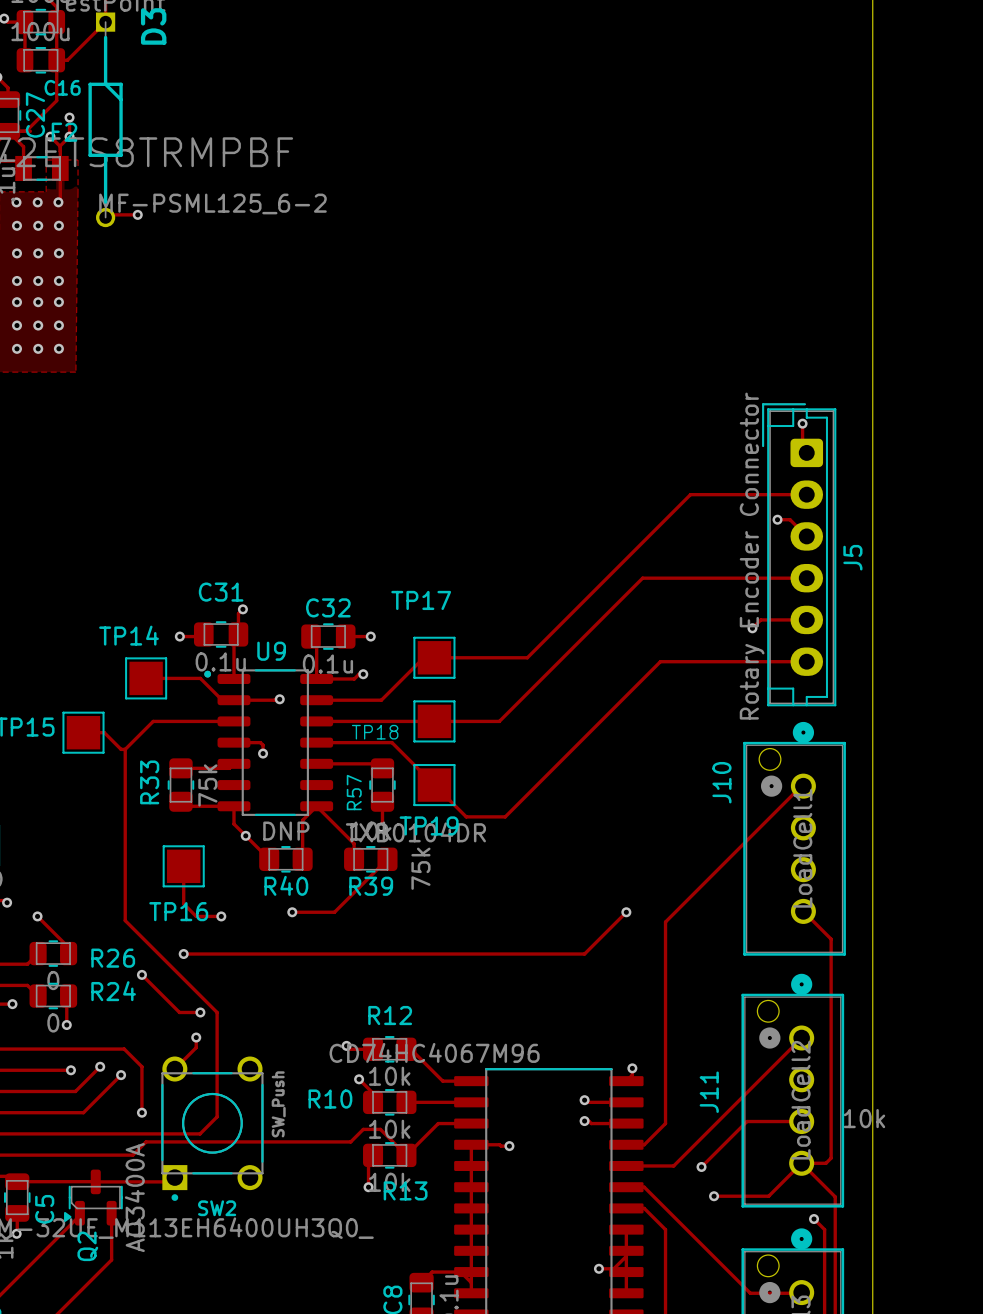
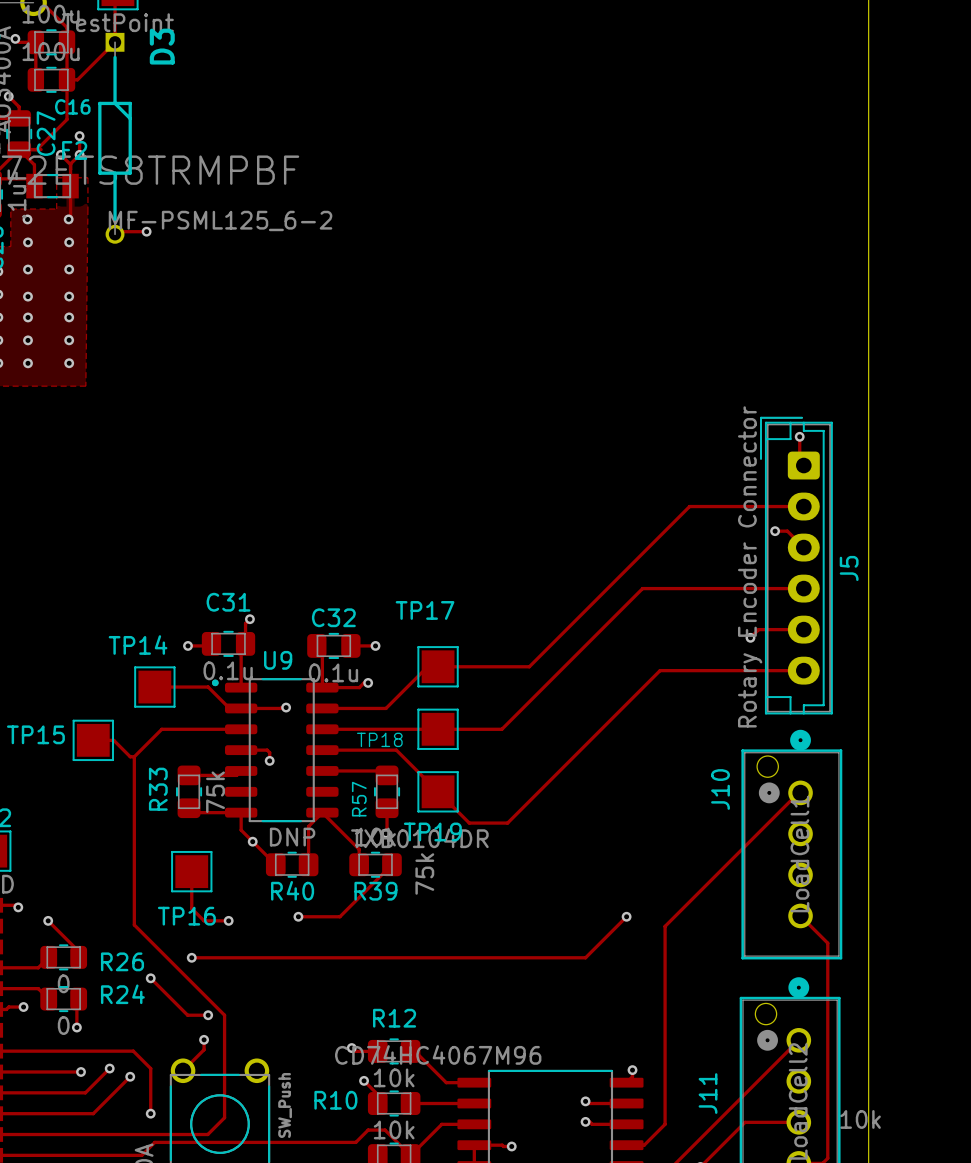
via: (37, 202) -> none
via: (38, 225) -> none
via: (38, 253) -> none
via: (38, 280) -> none
via: (38, 302) -> none
via: (38, 325) -> none
via: (38, 348) -> none

